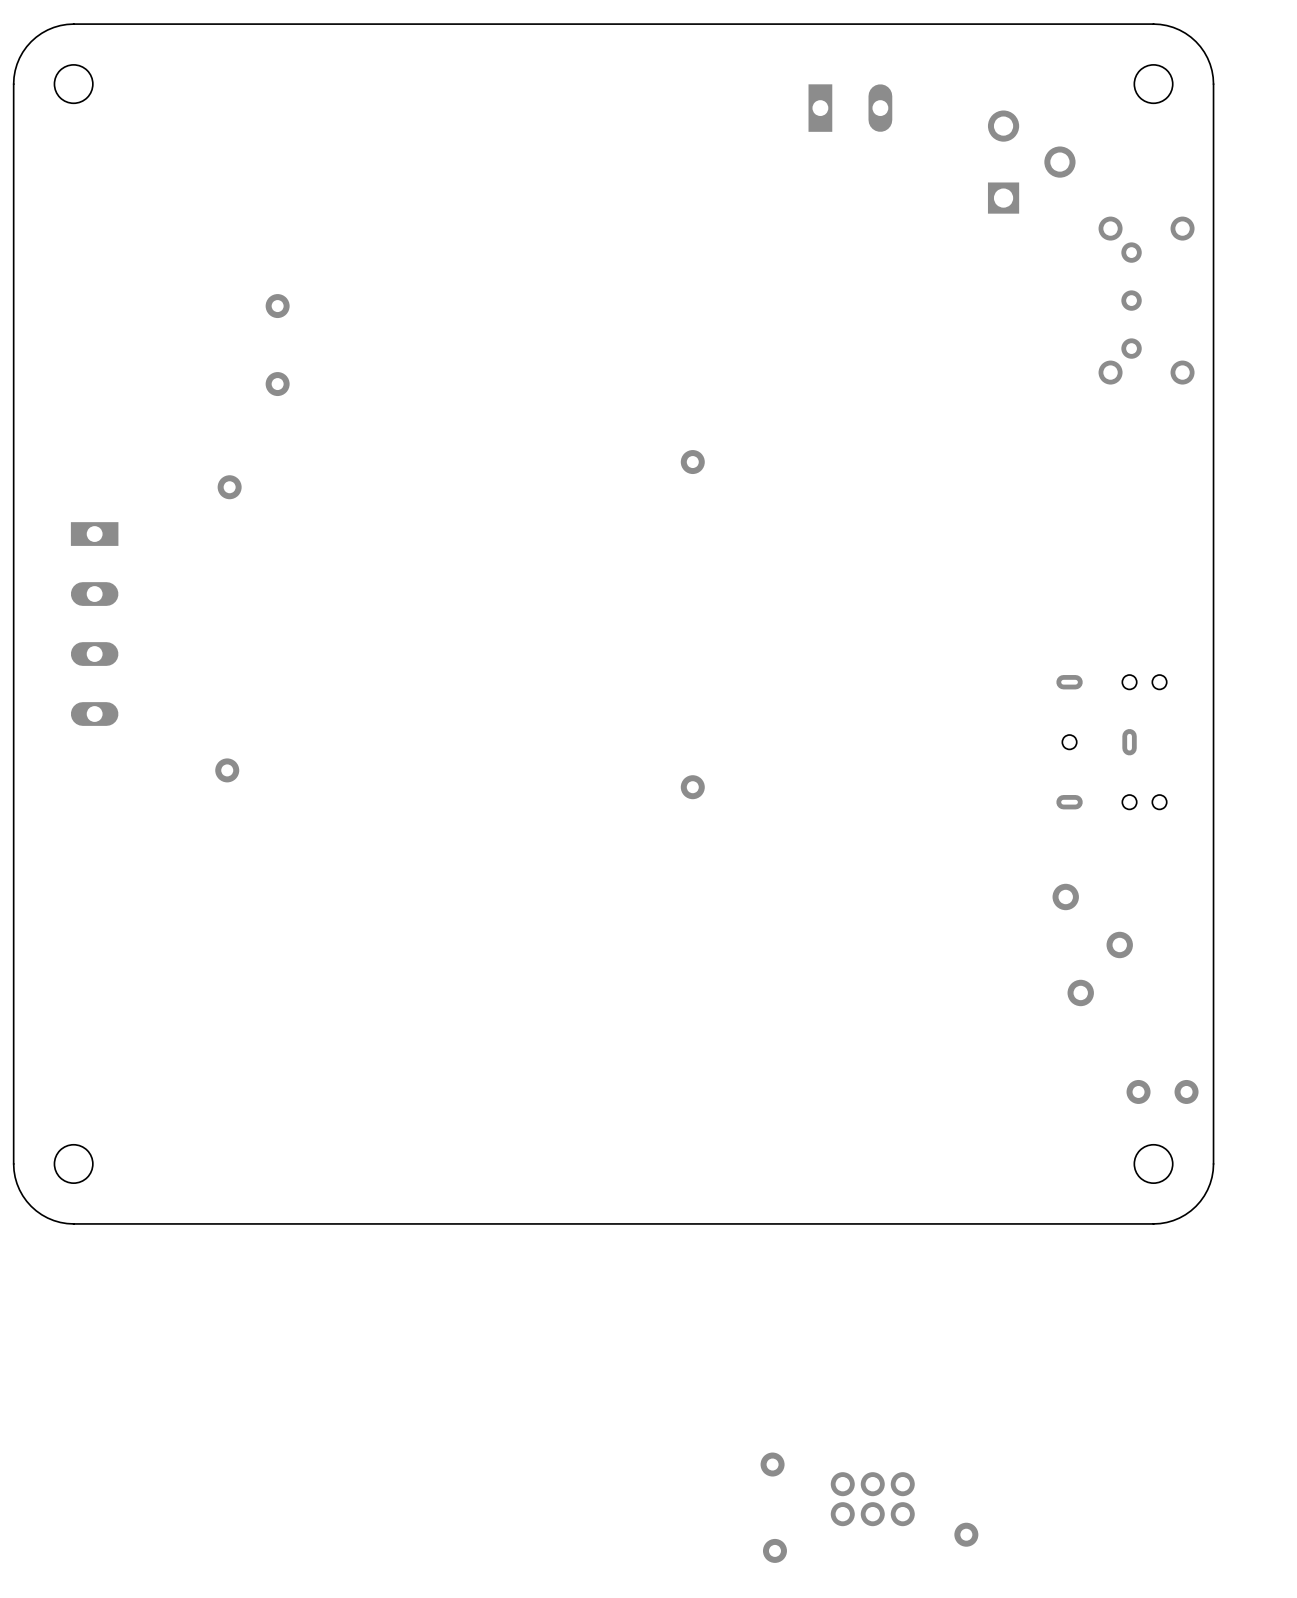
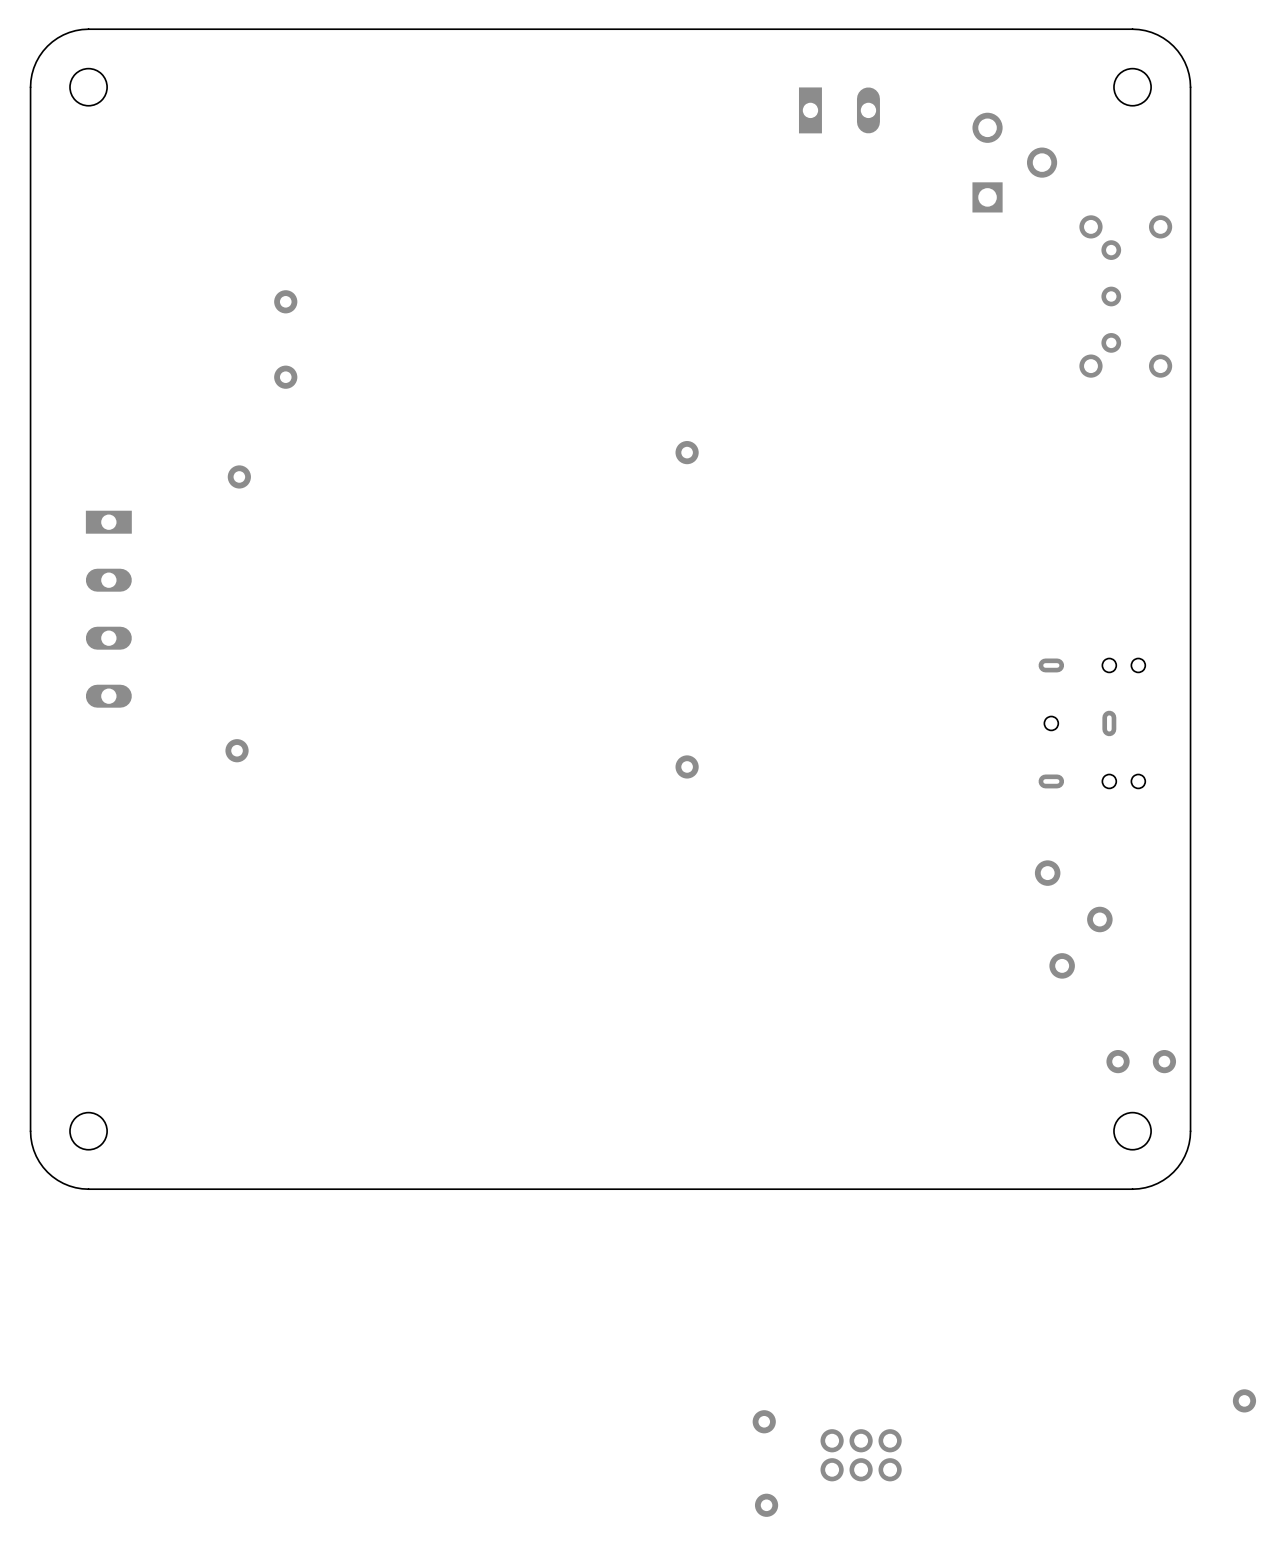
part: none -> (1244, 1400)
part: (966, 1534) -> none

